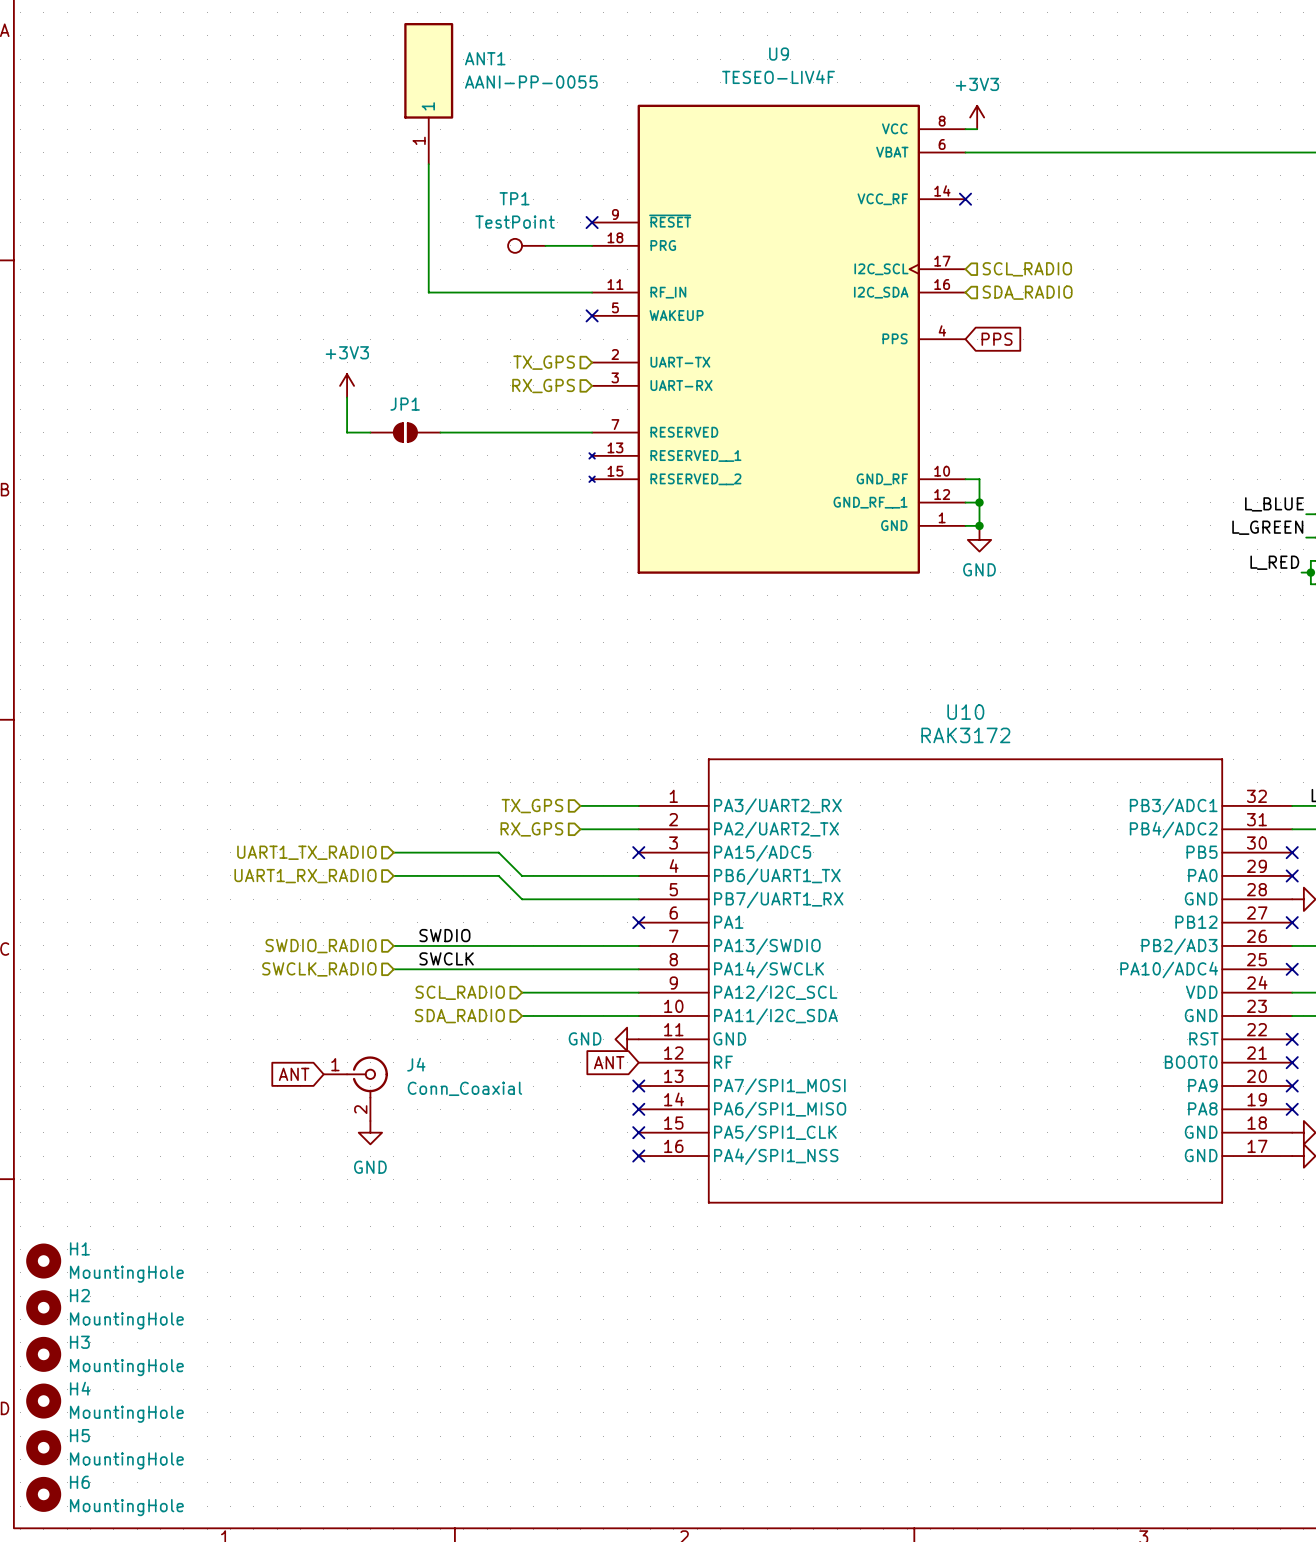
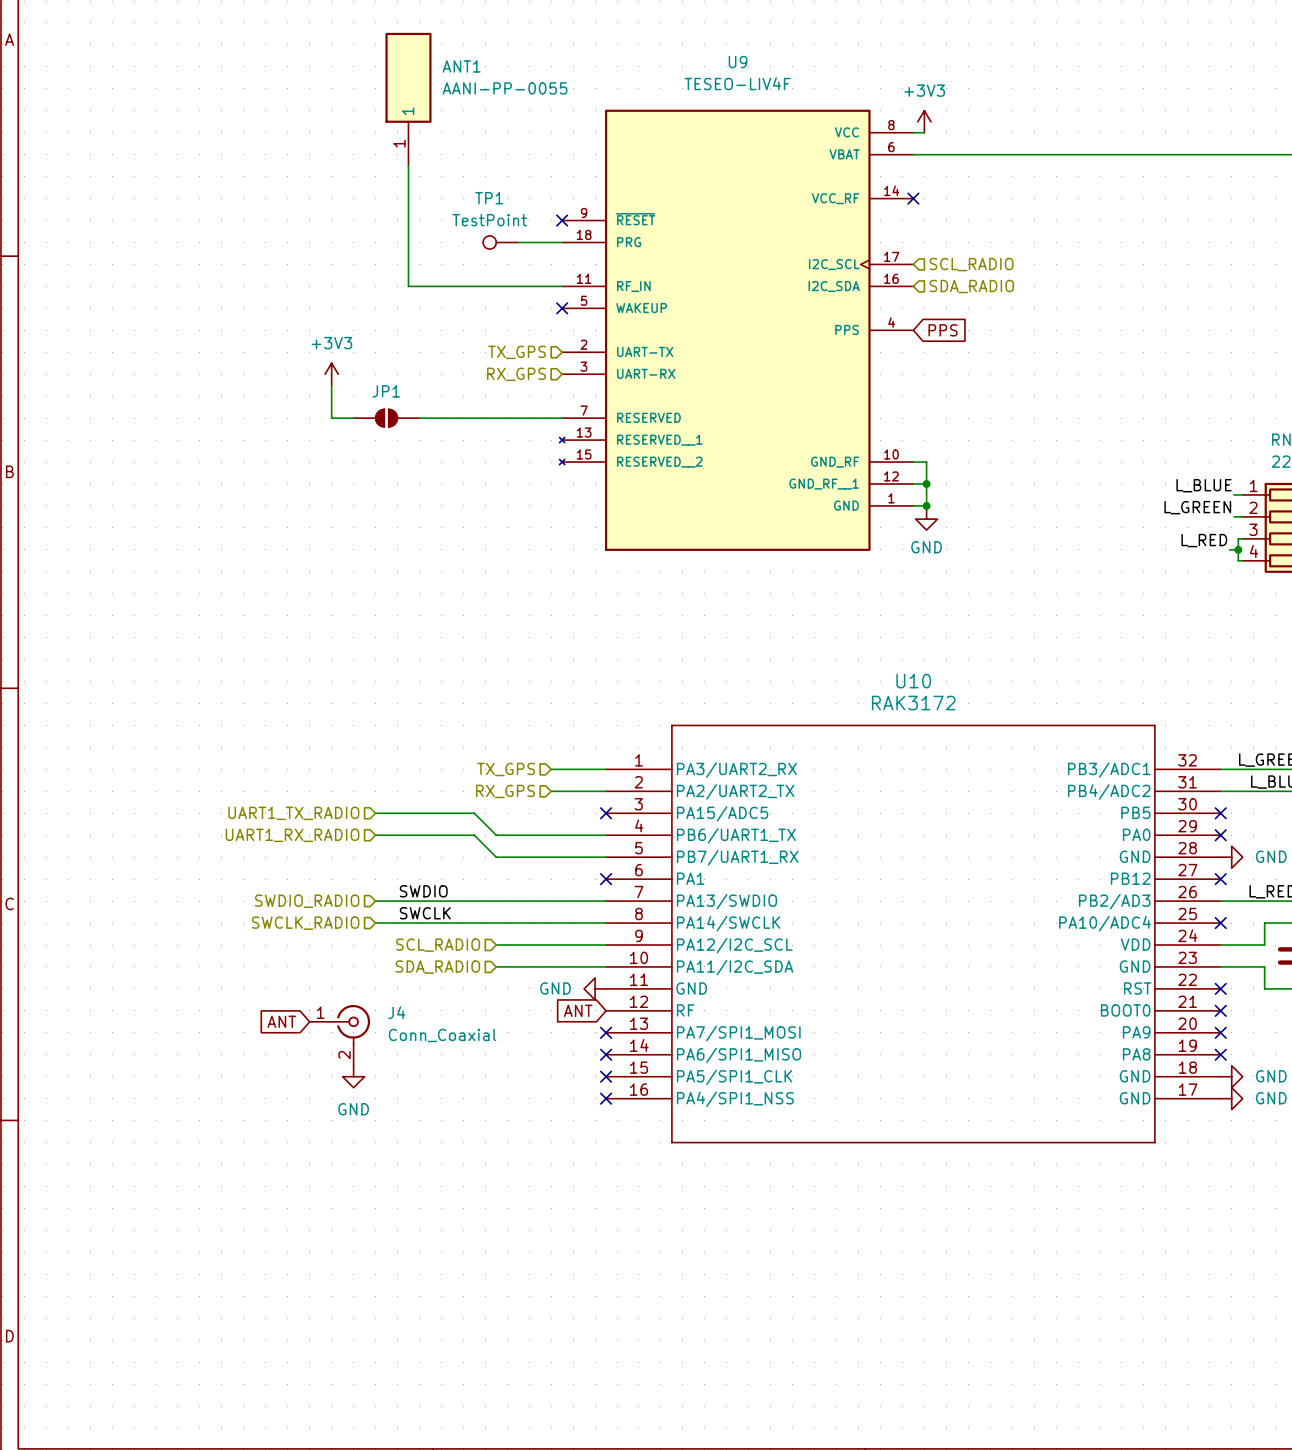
H1: MountingHole (43, 1261) -> none
H2: MountingHole (43, 1307) -> none
H3: MountingHole (43, 1354) -> none
H4: MountingHole (43, 1401) -> none
H5: MountingHole (43, 1447) -> none
H6: MountingHole (43, 1494) -> none

